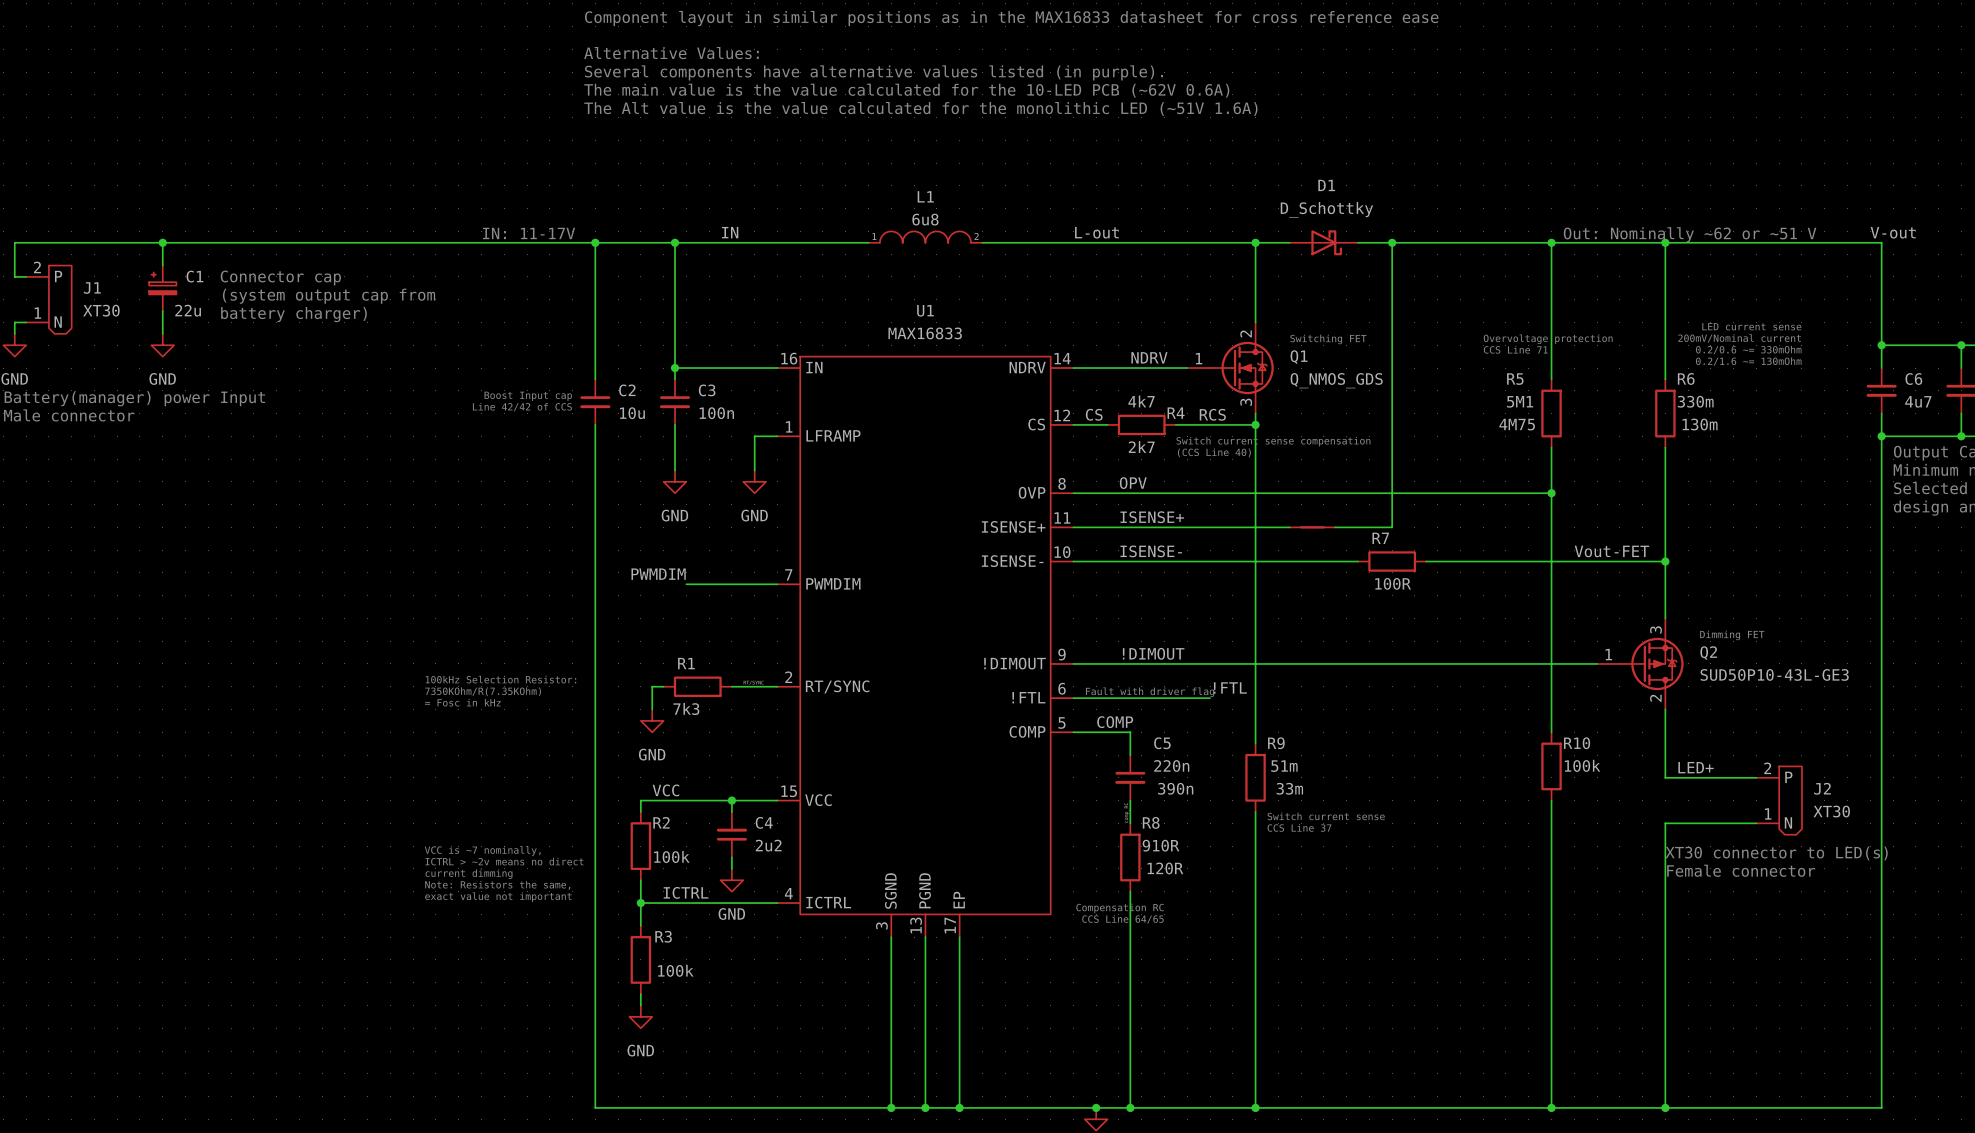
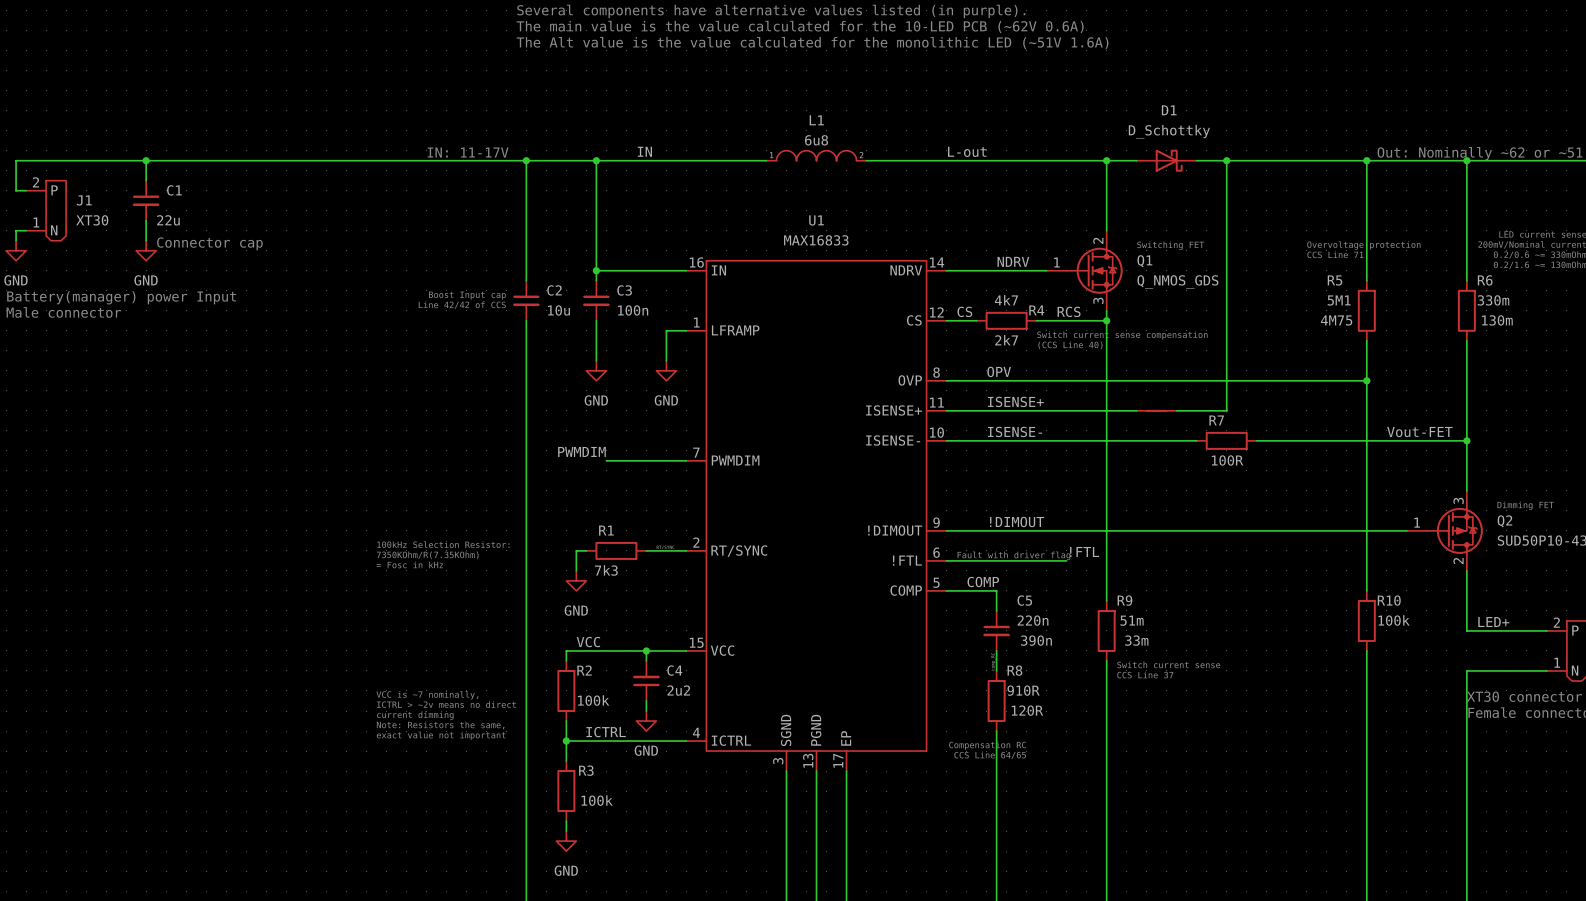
C1 symbol: [149, 265, 177, 312] -> [132, 180, 160, 221]
text position: Connector cap (280, 278) -> Connector cap (209, 243)
text: (system output cap from (329, 296) -> none
text: battery charger) (293, 314) -> none

